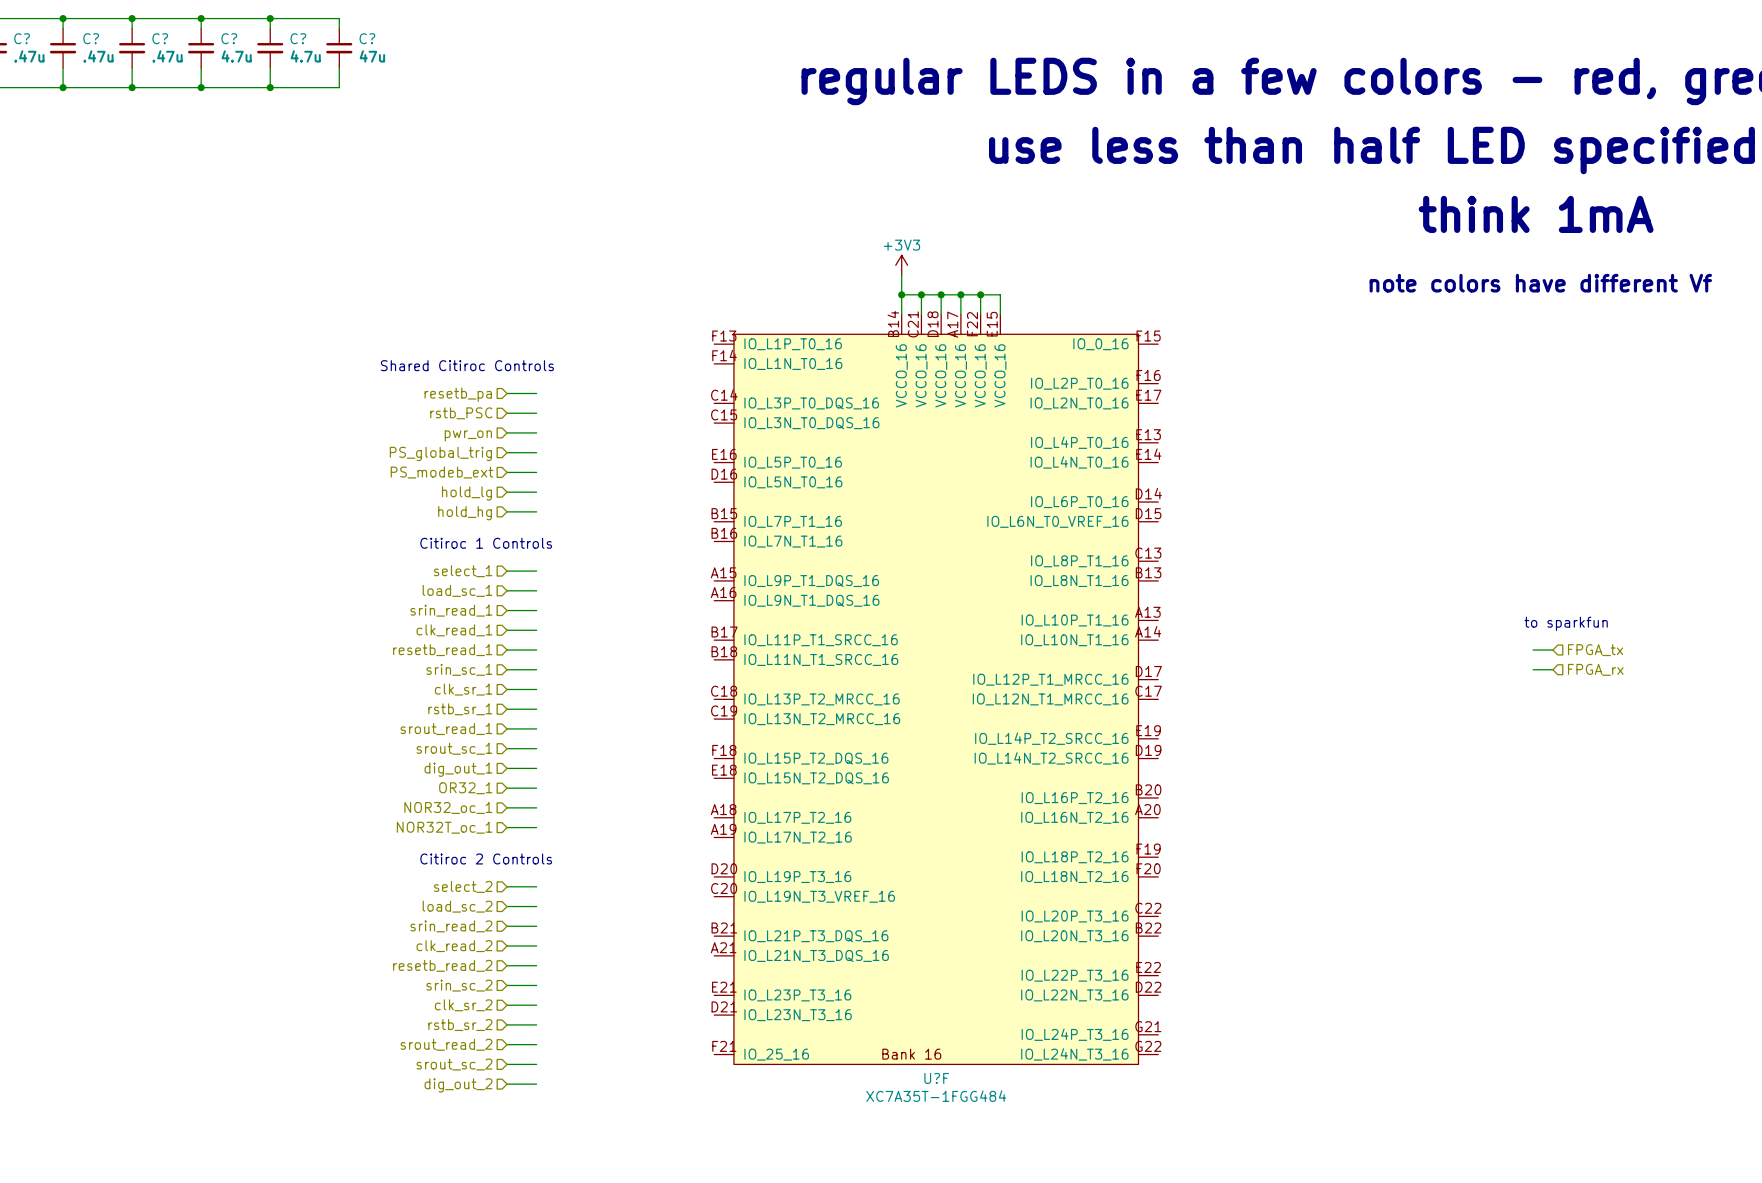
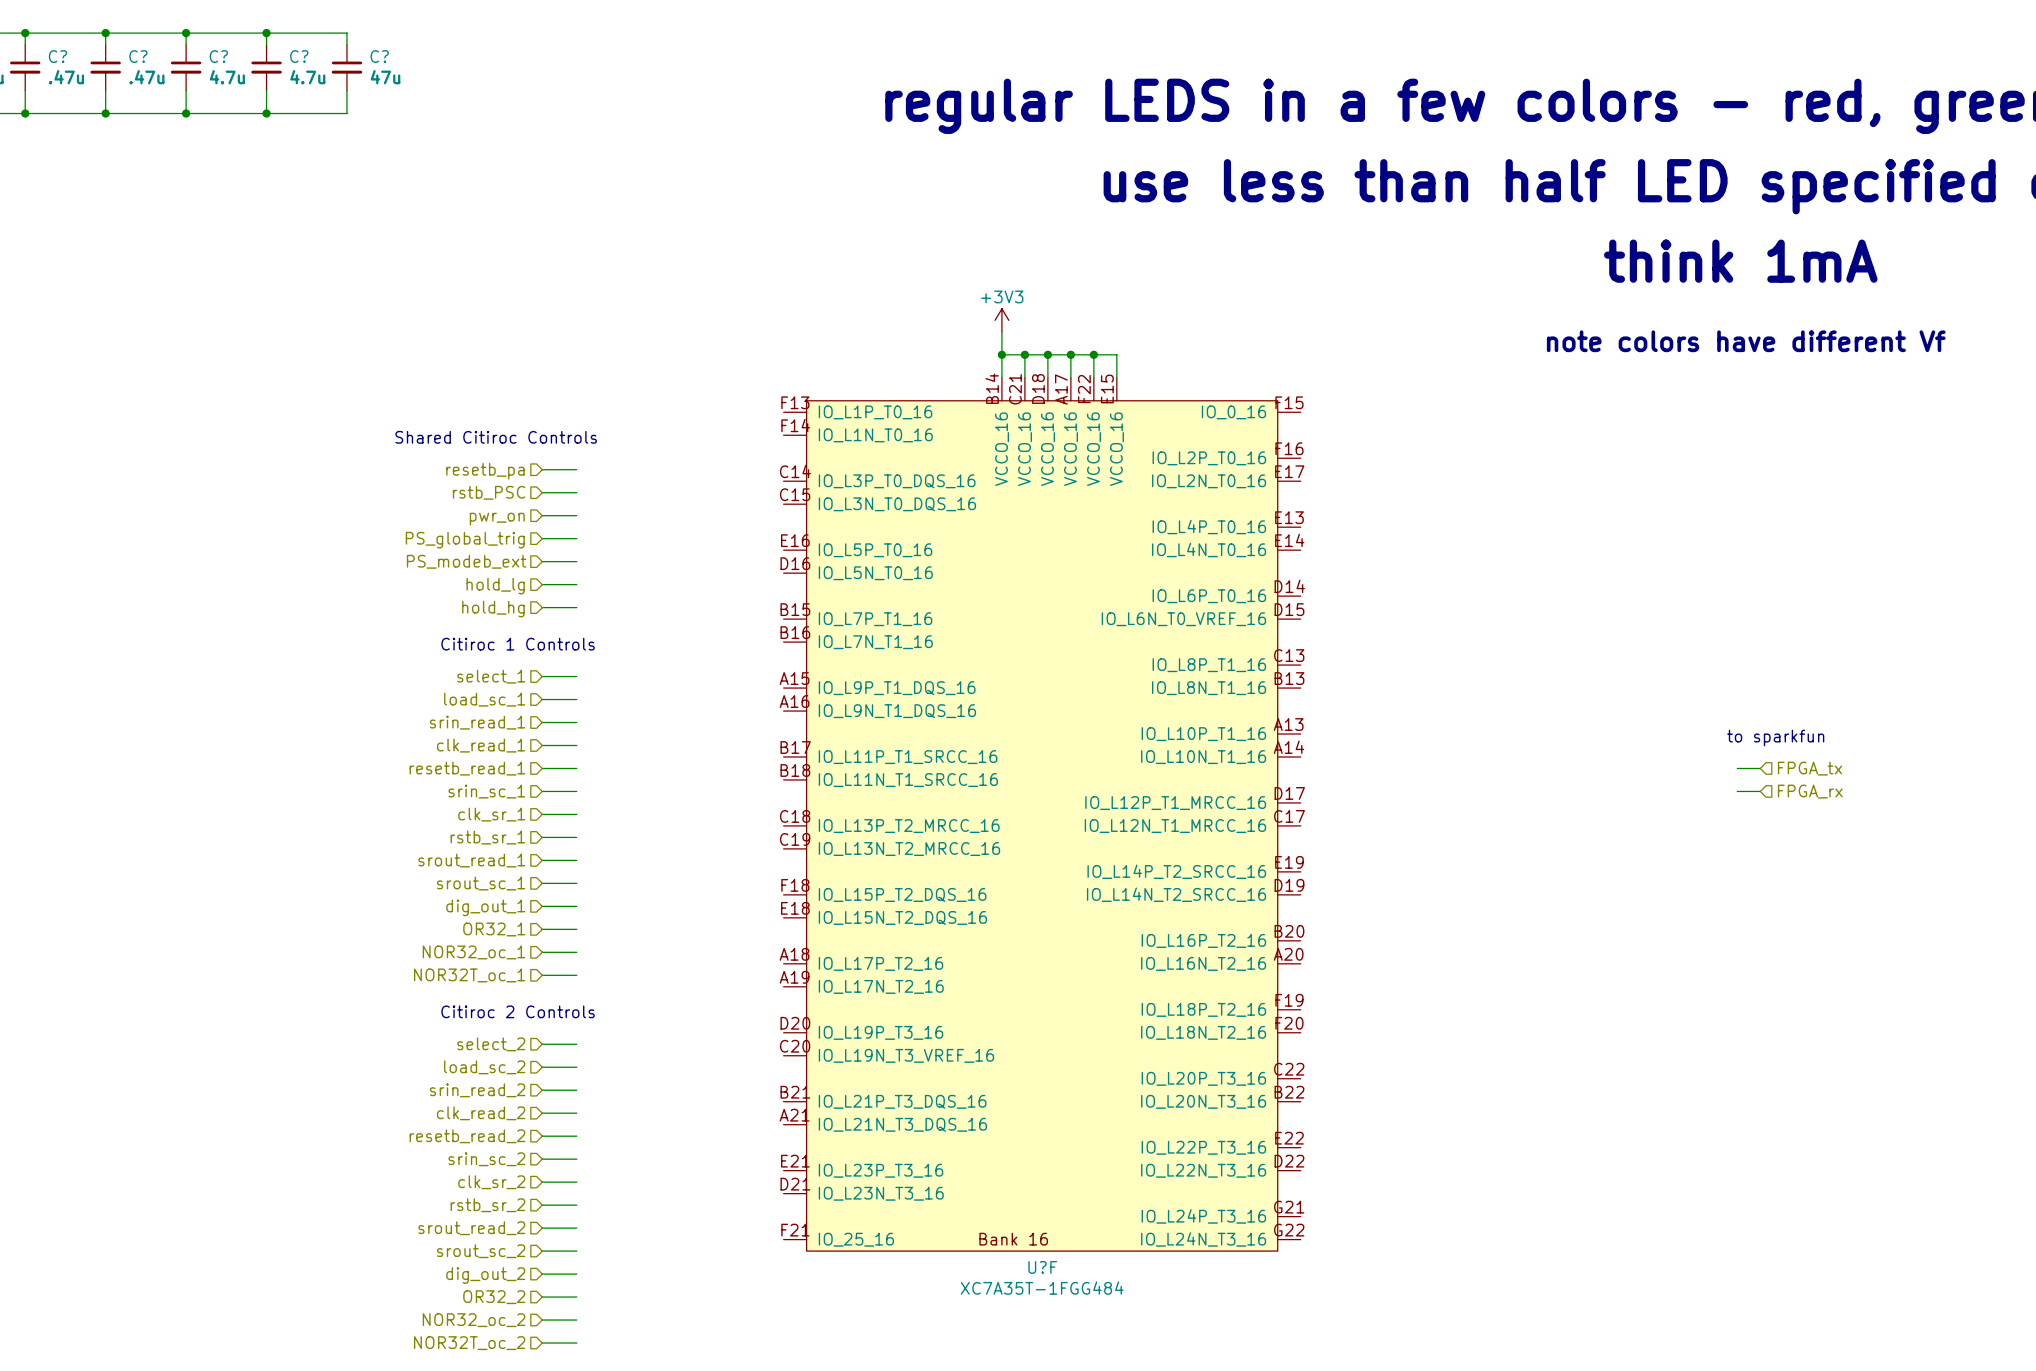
hierarchical label: none -> OR32_2 (494, 1297)
wire: none -> (542, 1297) (576, 1297)
hierarchical label: none -> NOR32_oc_2 (474, 1320)
wire: none -> (542, 1320) (576, 1320)
hierarchical label: none -> NOR32T_oc_2 (469, 1343)
wire: none -> (542, 1343) (576, 1343)

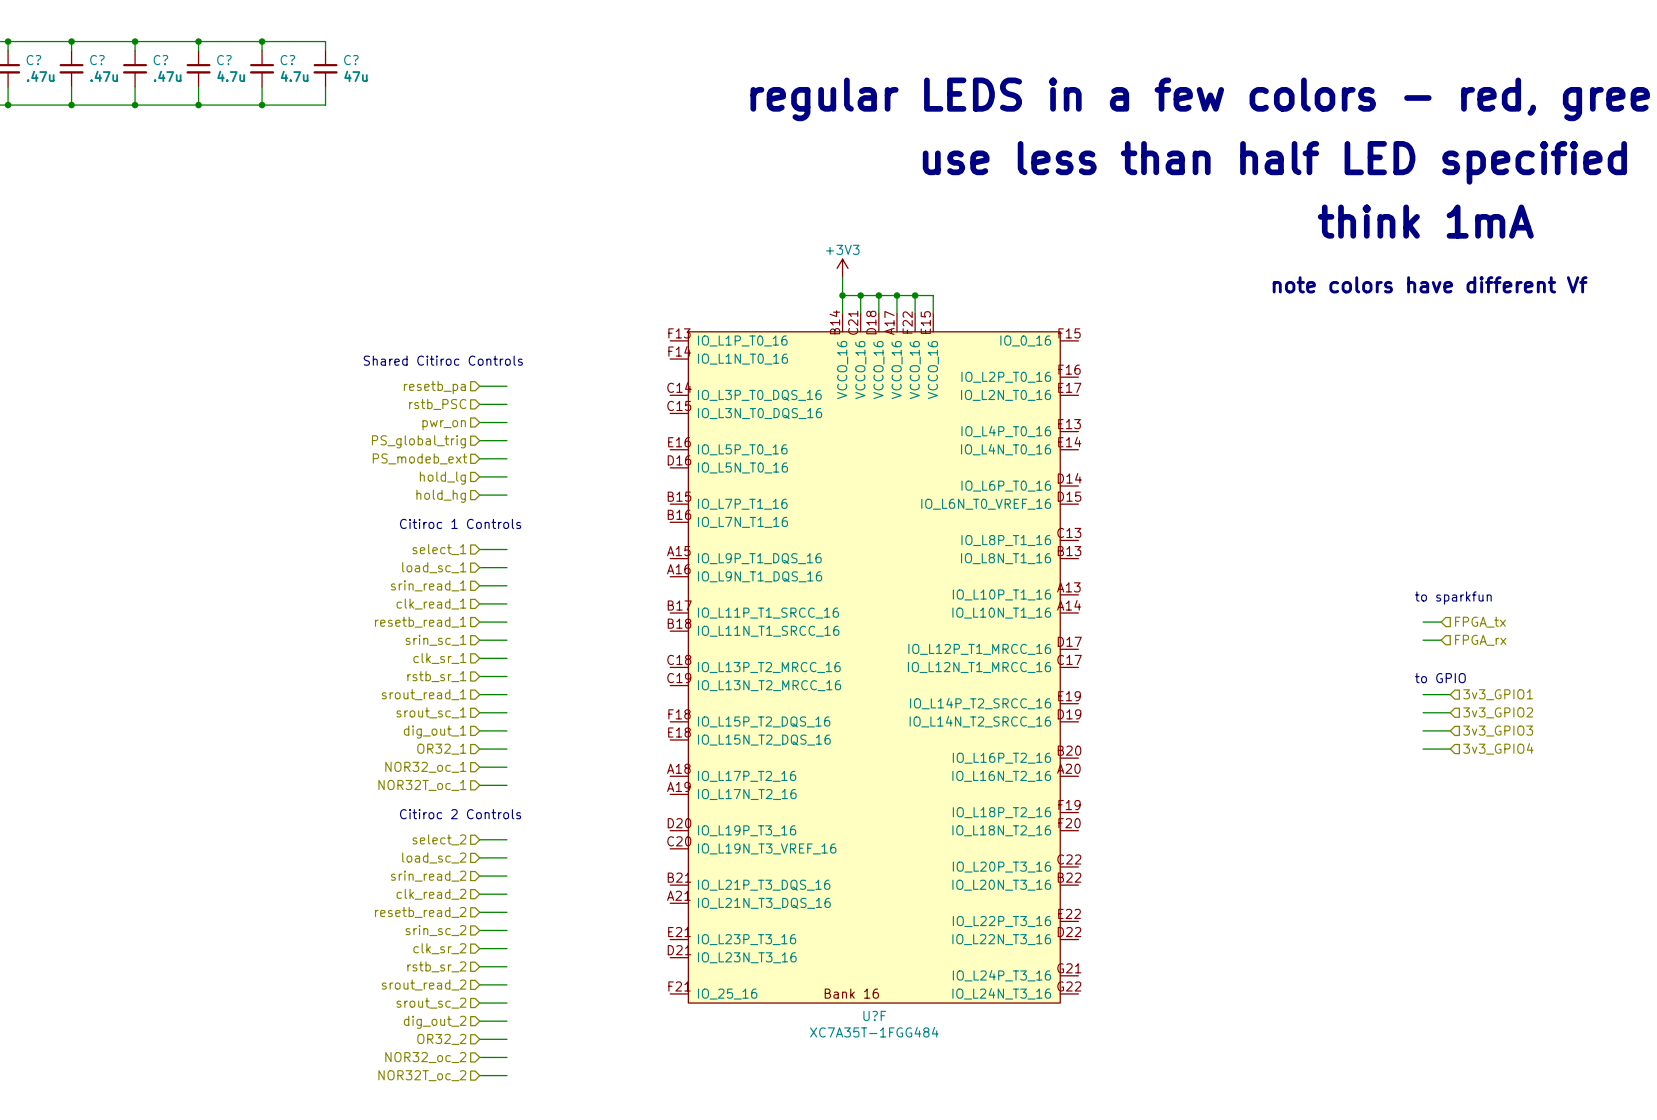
text: none -> to GPIO (1440, 678)
wire: none -> (1423, 694) (1450, 694)
hierarchical label: none -> 3v3_GPIO1 (1498, 694)
wire: none -> (1423, 712) (1450, 712)
hierarchical label: none -> 3v3_GPIO2 (1498, 712)
wire: none -> (1423, 730) (1450, 730)
hierarchical label: none -> 3v3_GPIO3 (1498, 731)
wire: none -> (1423, 749) (1450, 749)
hierarchical label: none -> 3v3_GPIO4 (1498, 748)

